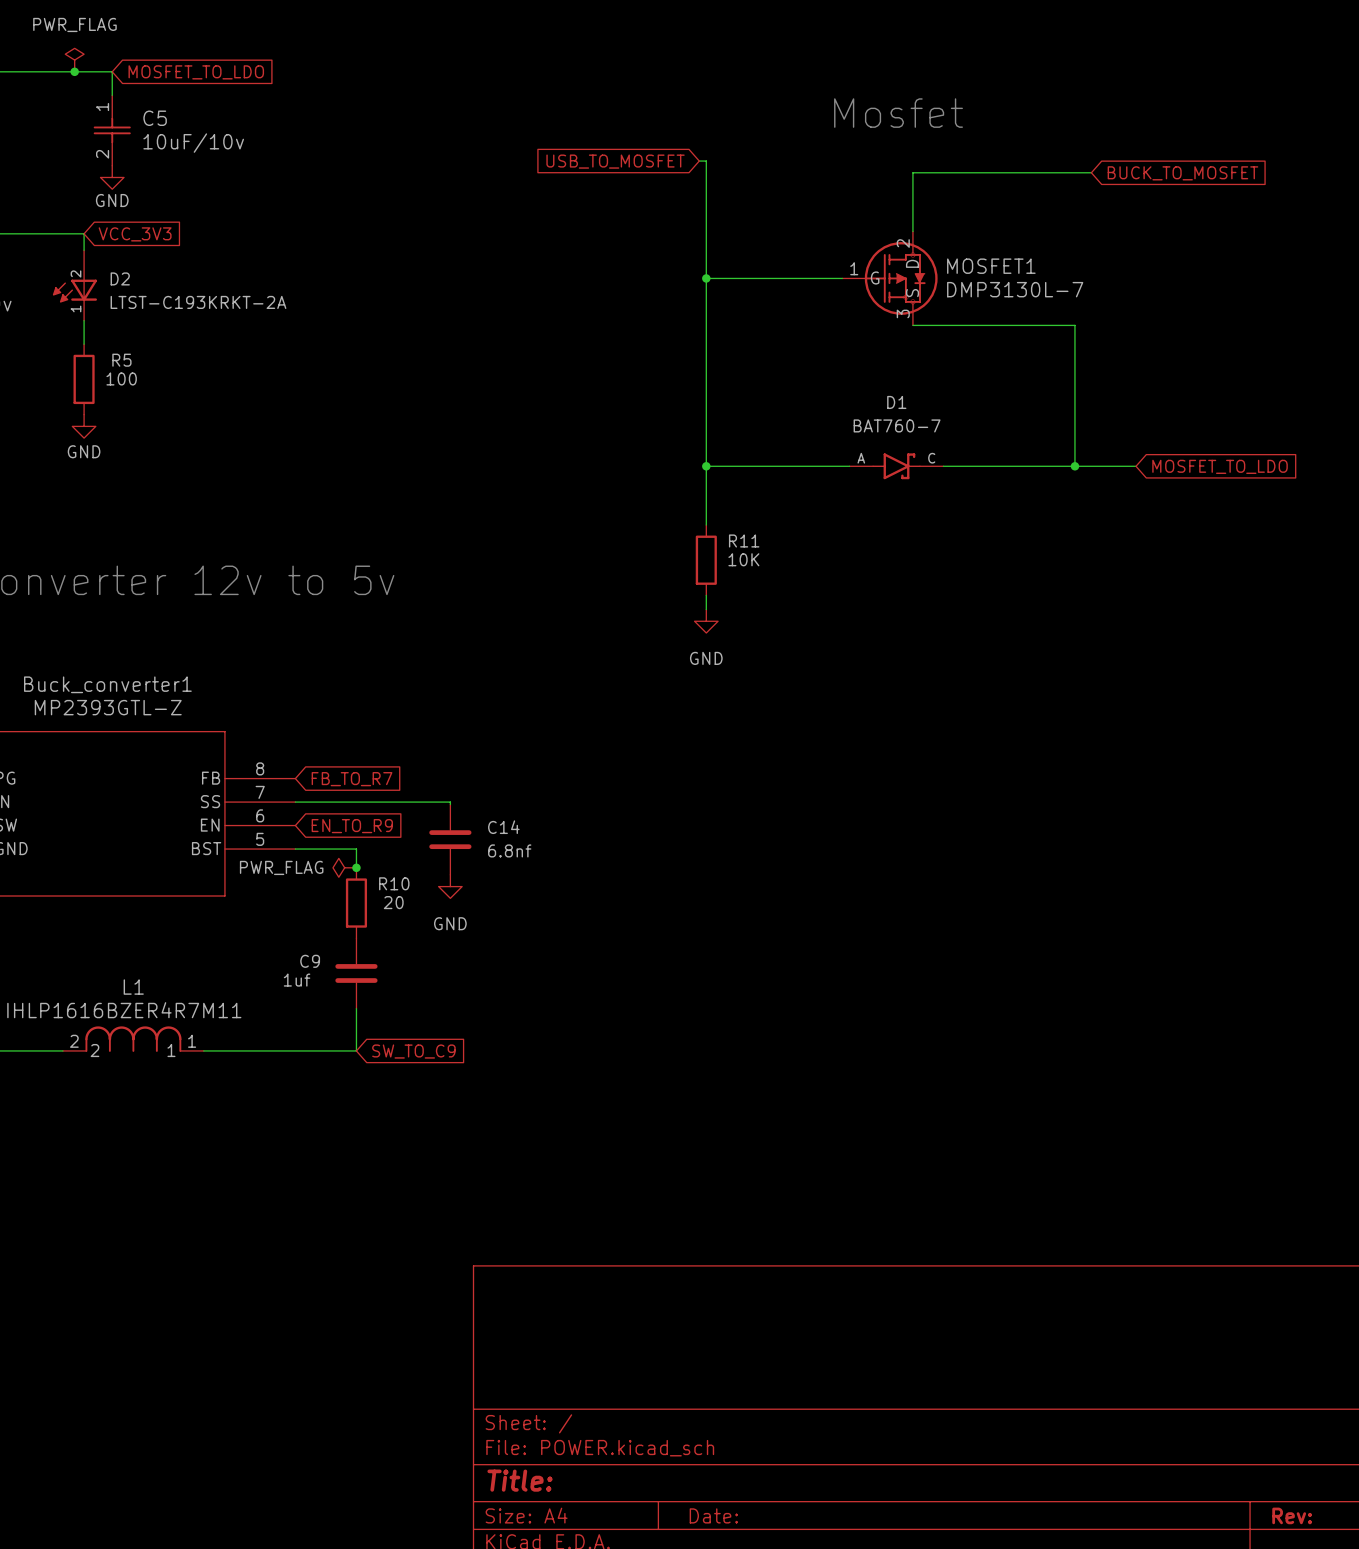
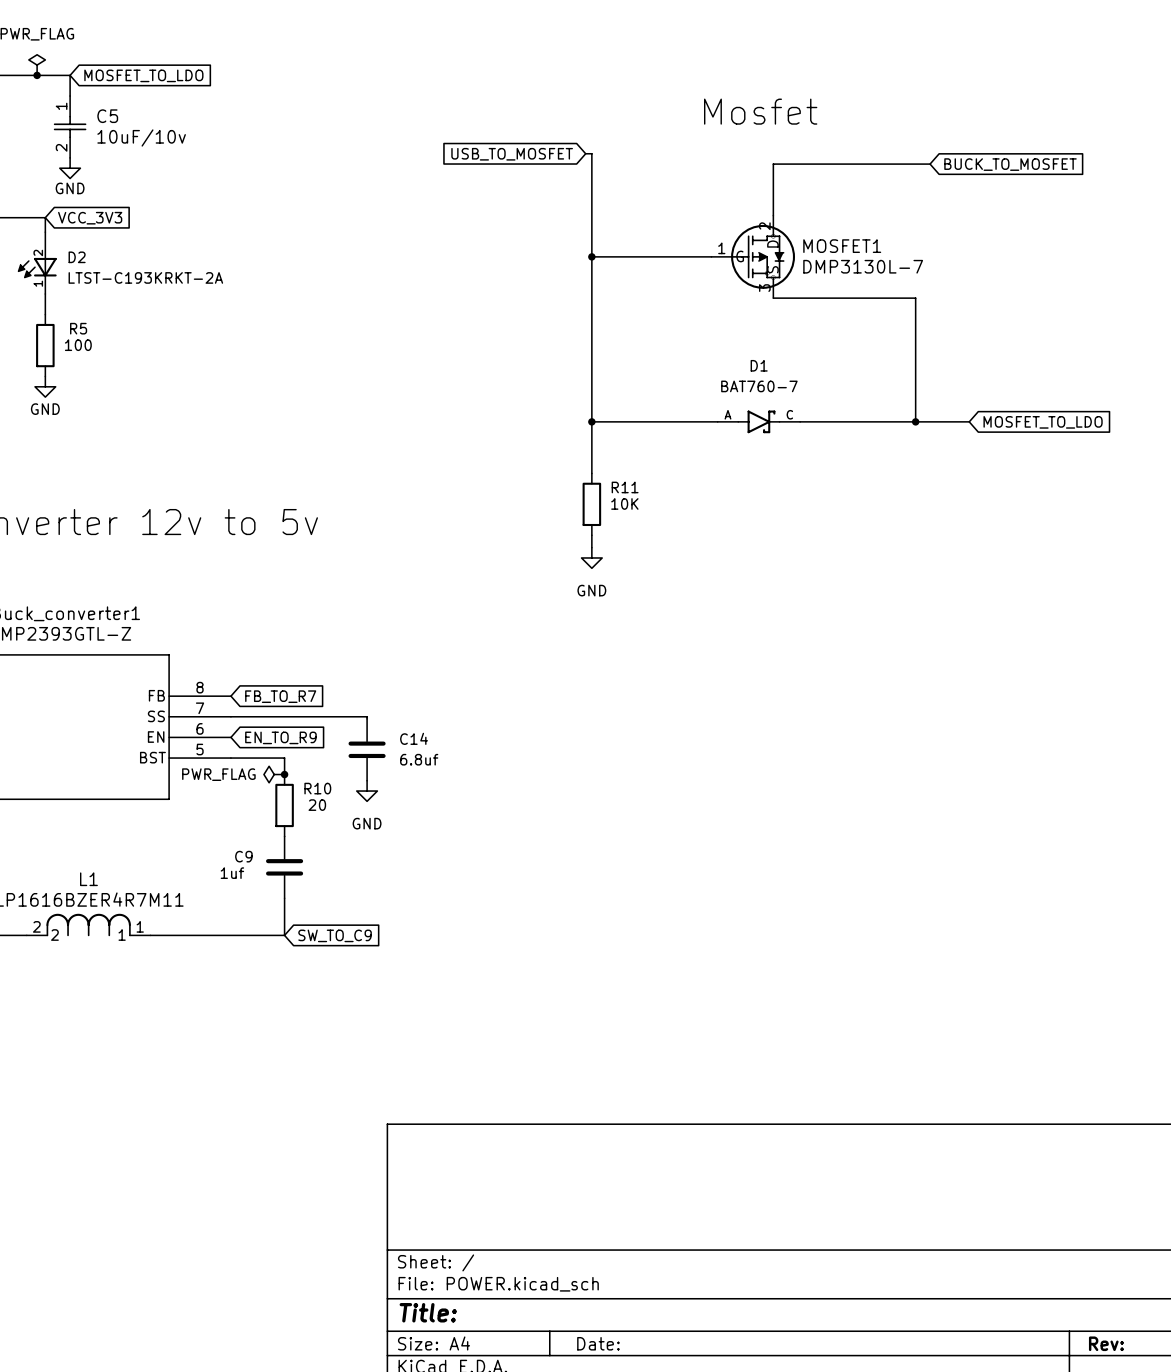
C14 value: 6.8nf (509, 850) -> 6.8uf (419, 759)

